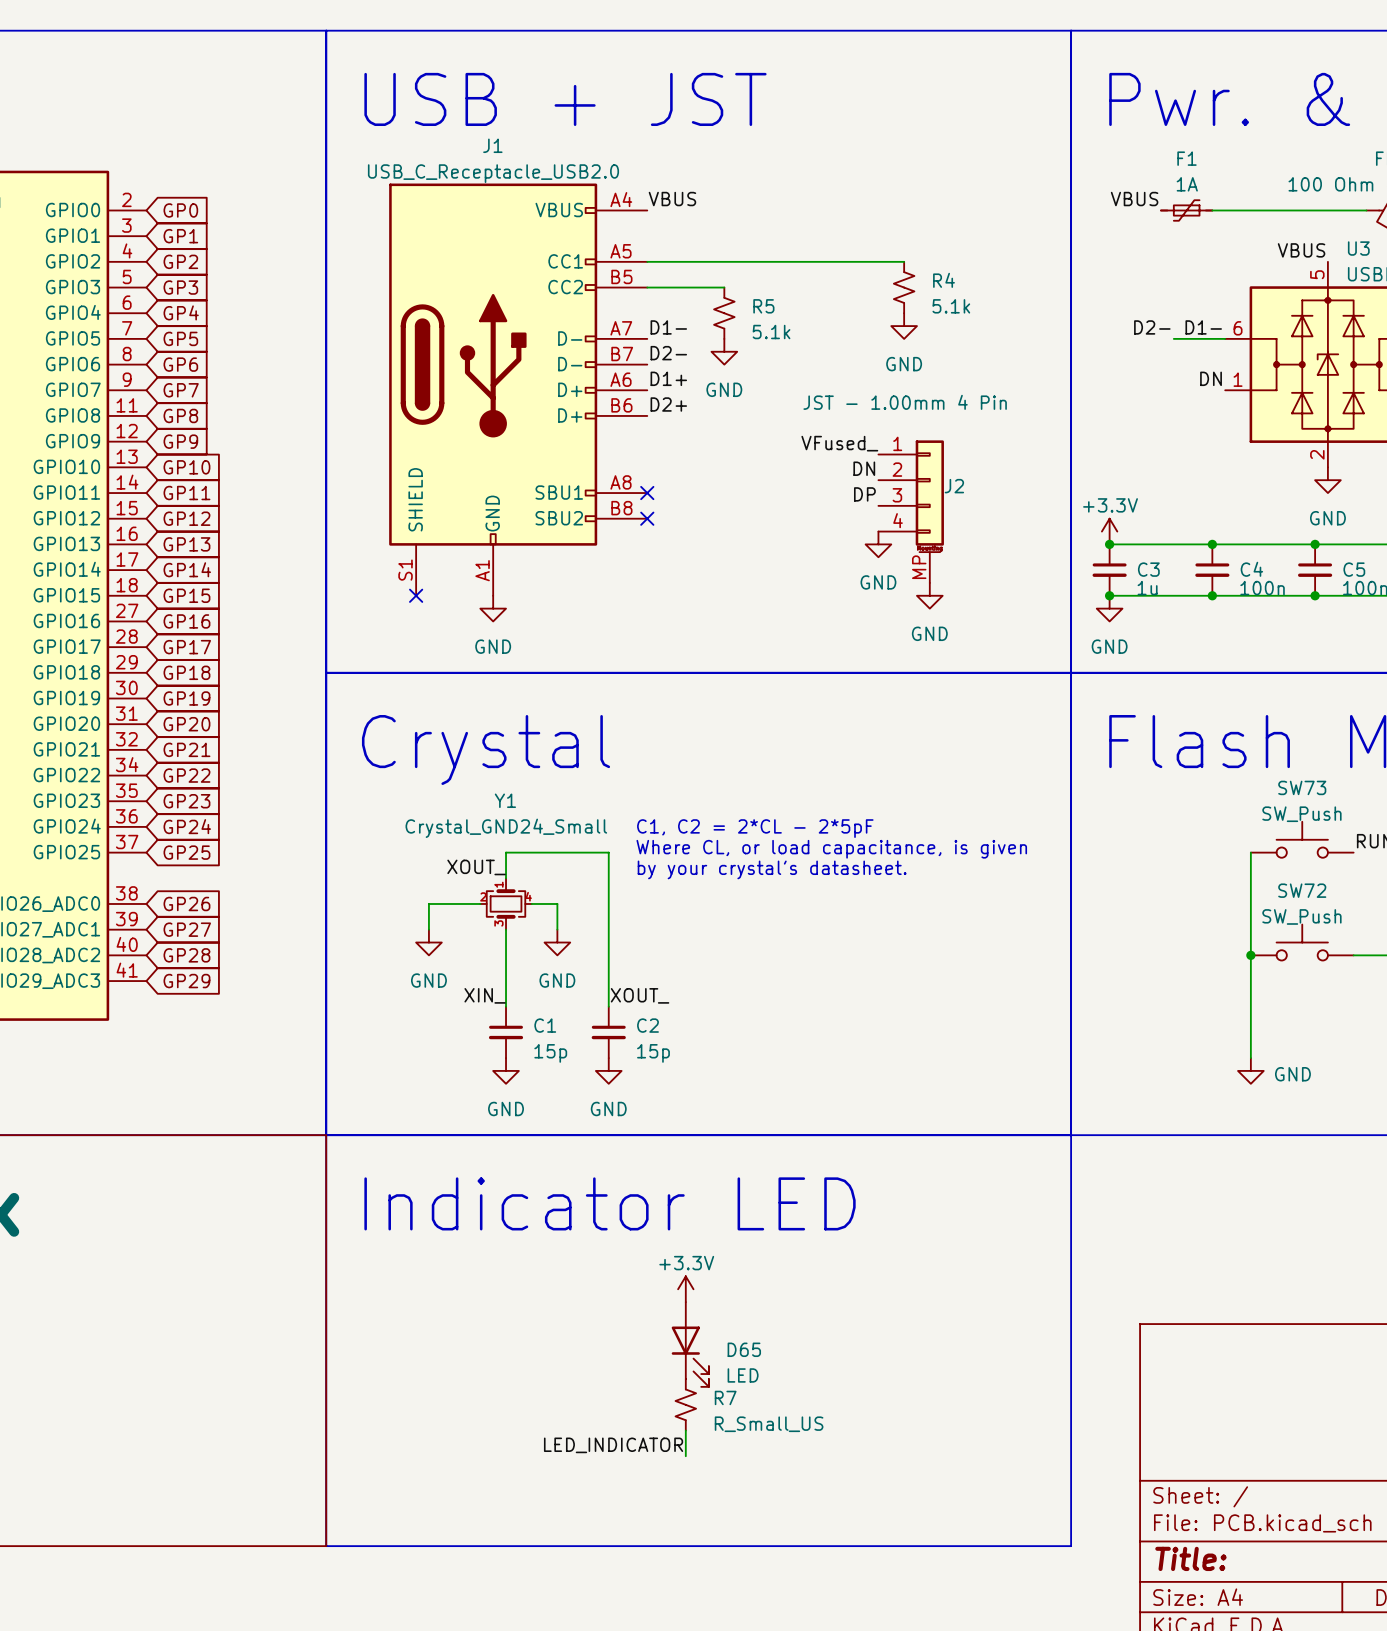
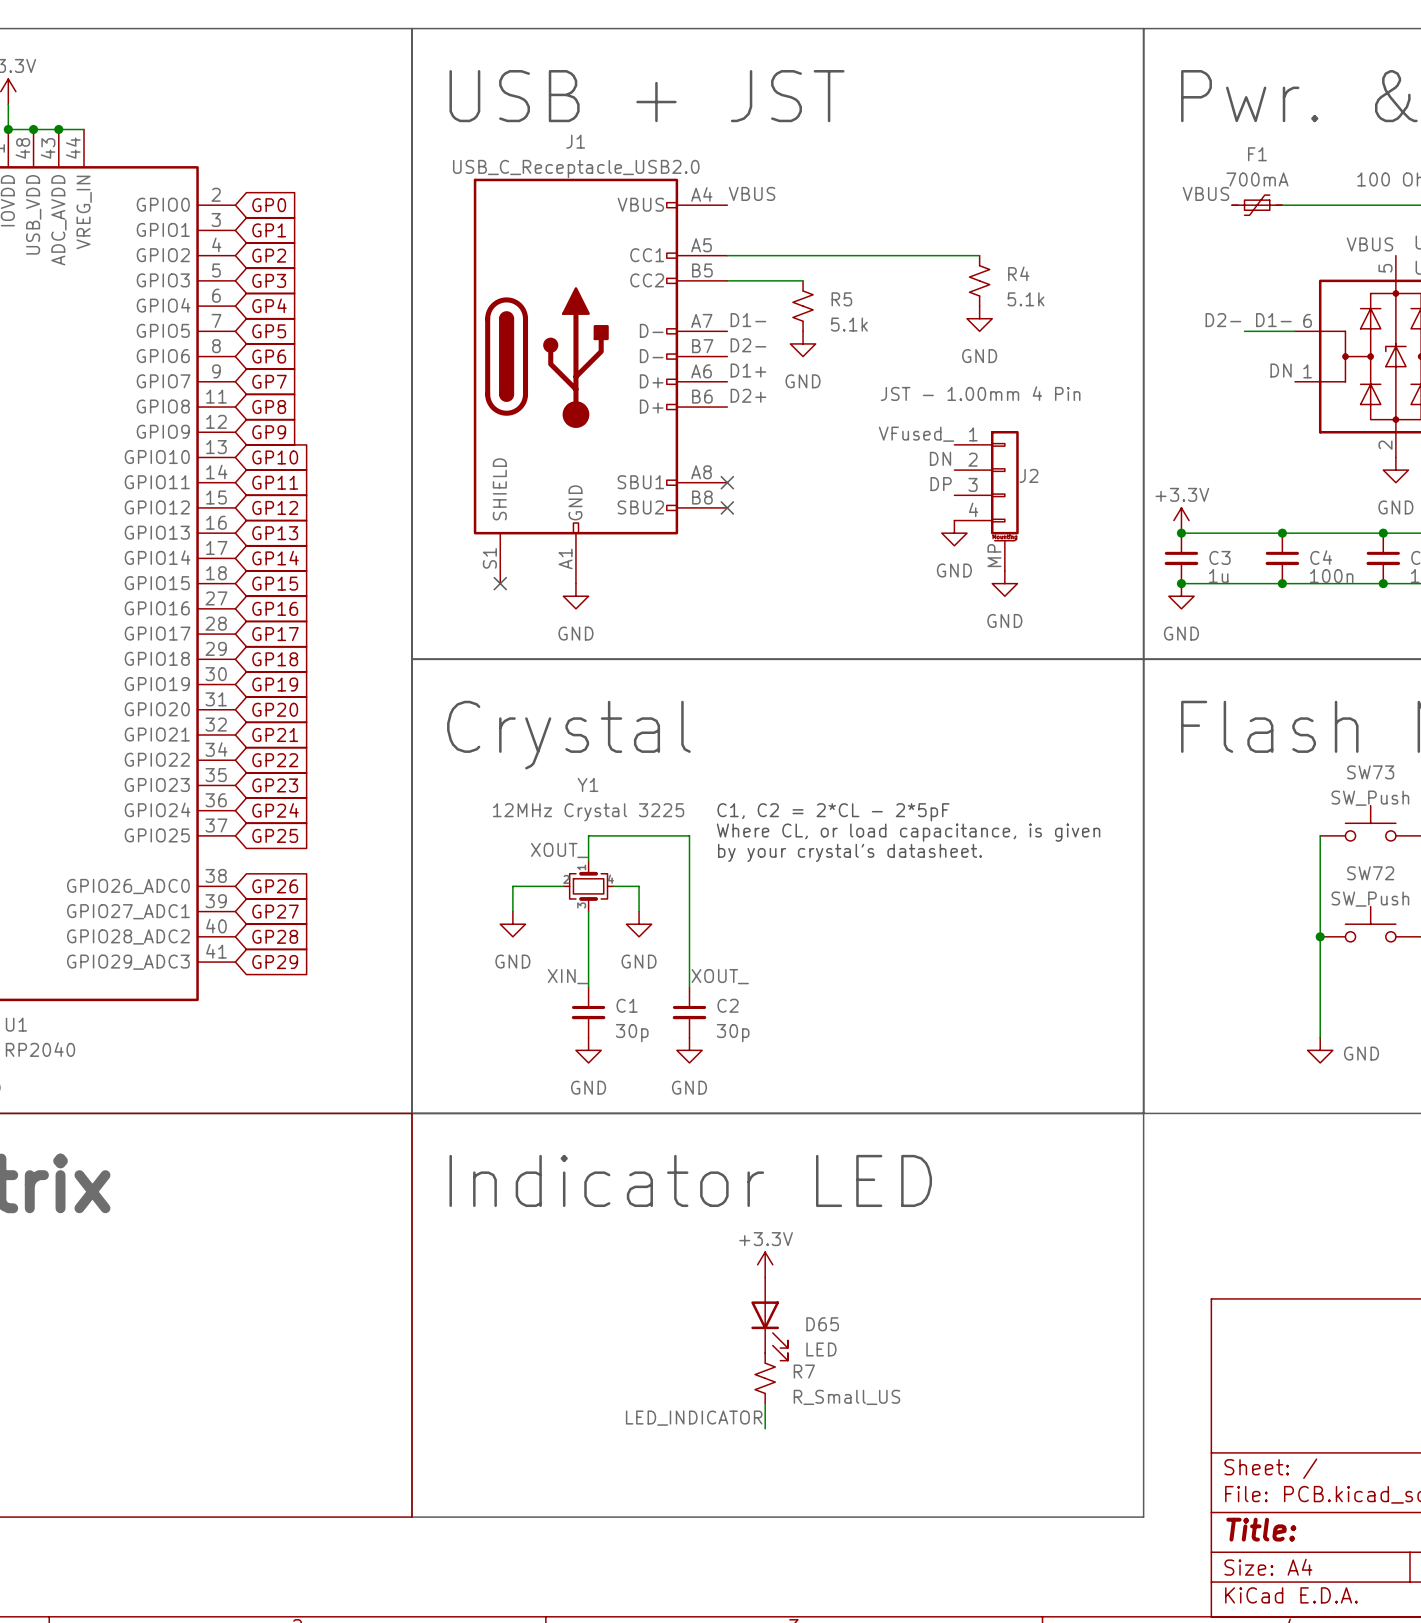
F1 value: 1A (1187, 184) -> 700mA (1257, 179)
Y1 value: Crystal_GND24_Small (506, 828) -> 12MHz Crystal 3225 (588, 812)
C1 value: 15p (550, 1053) -> 30p (632, 1033)
C2 value: 15p (653, 1053) -> 30p (733, 1033)

